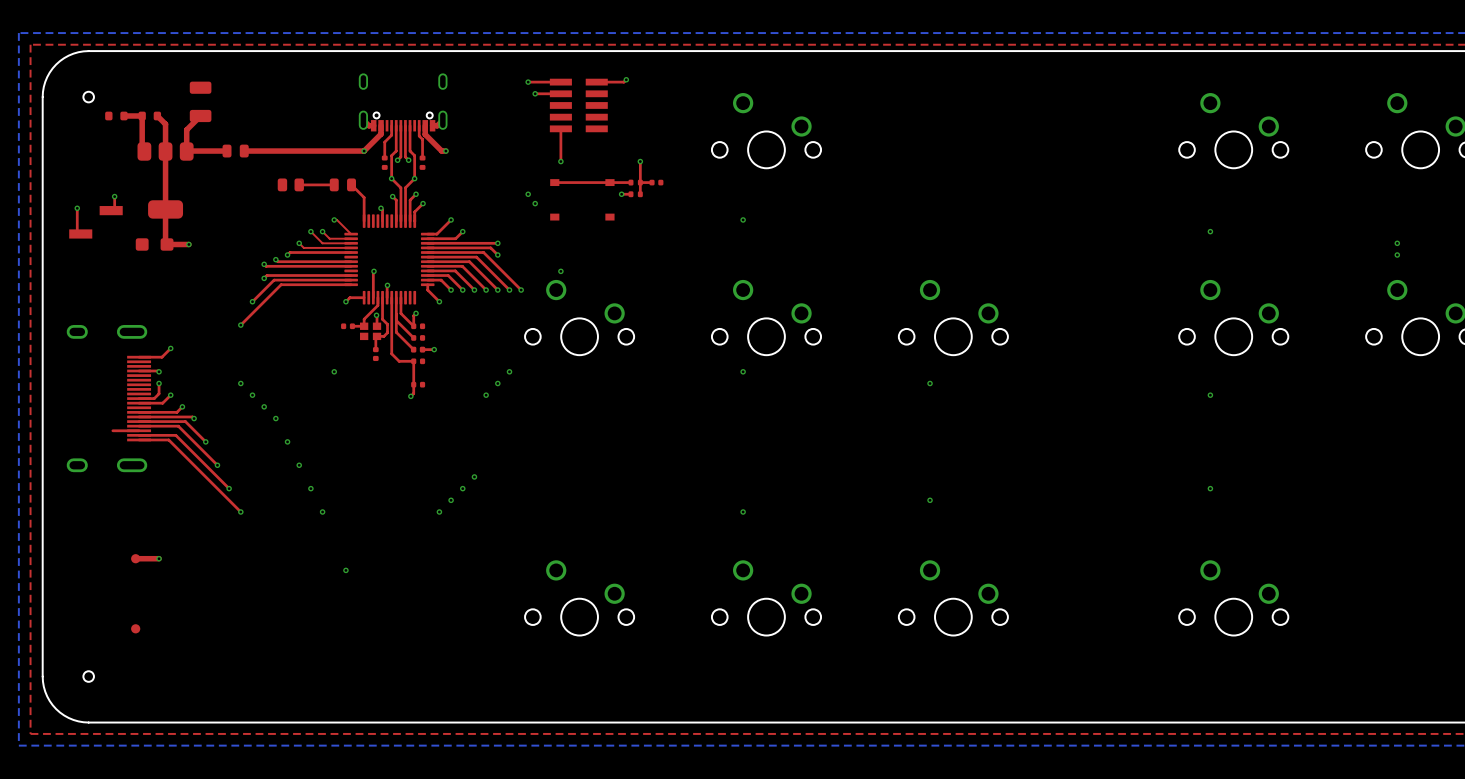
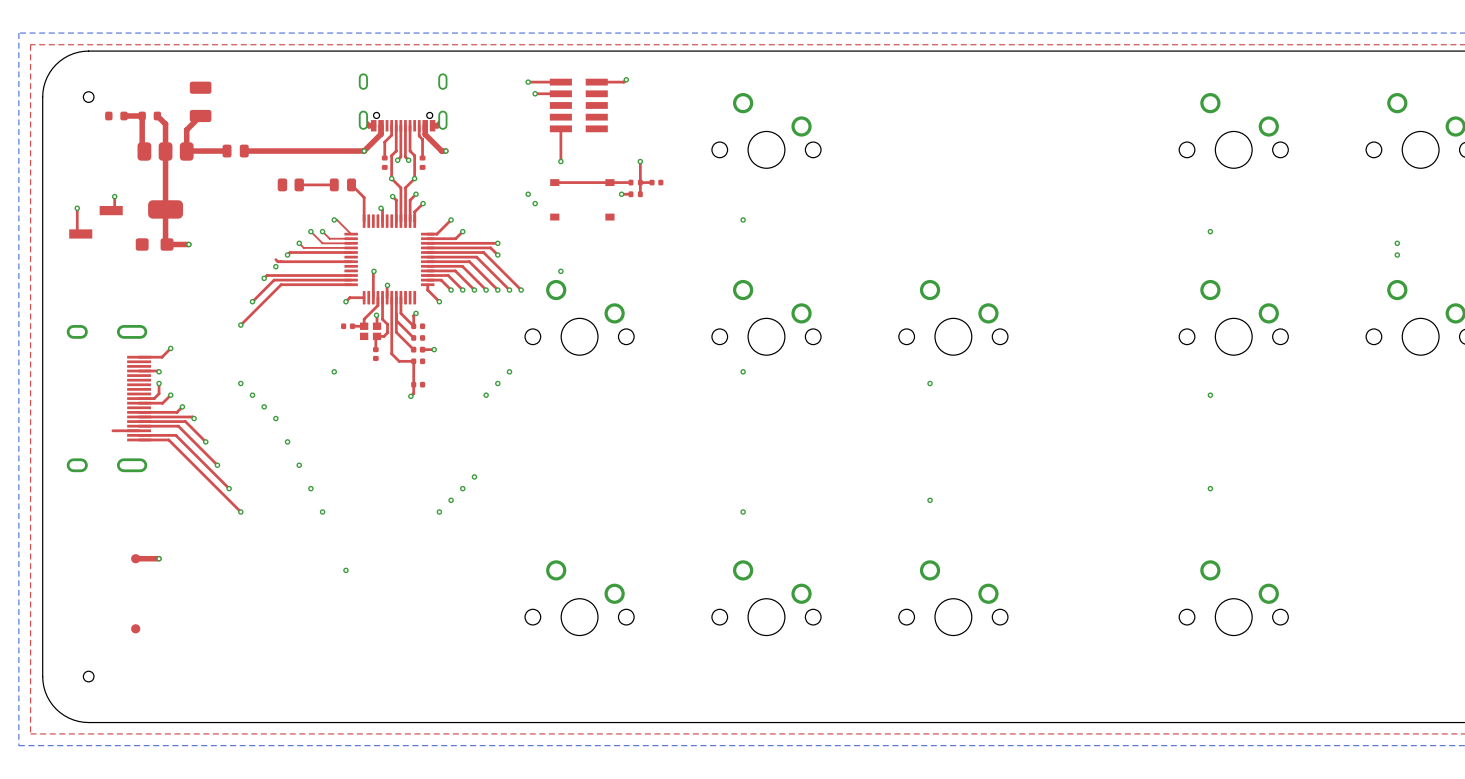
via: (275, 259) -> none
top track: (264, 264) (266, 266) (351, 266) -> none
via: (264, 264) -> none
via: none -> (275, 266)

